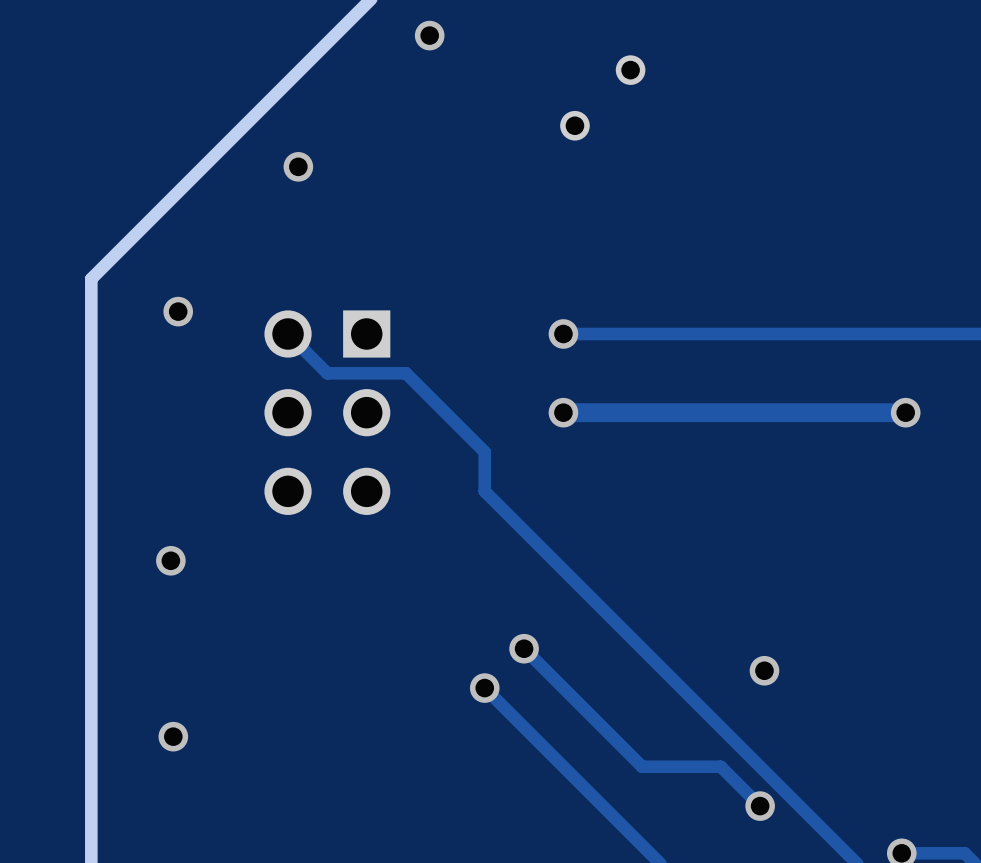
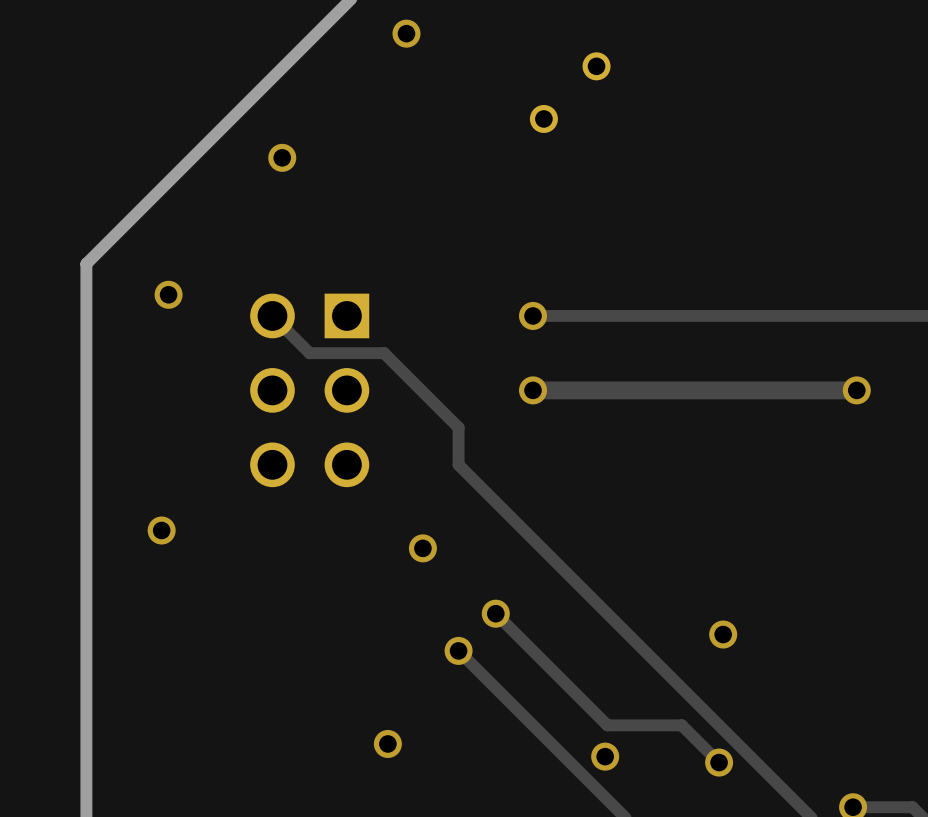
via: none -> (422, 548)
via: (173, 736) -> none
via: none -> (387, 743)
via: none -> (605, 756)

